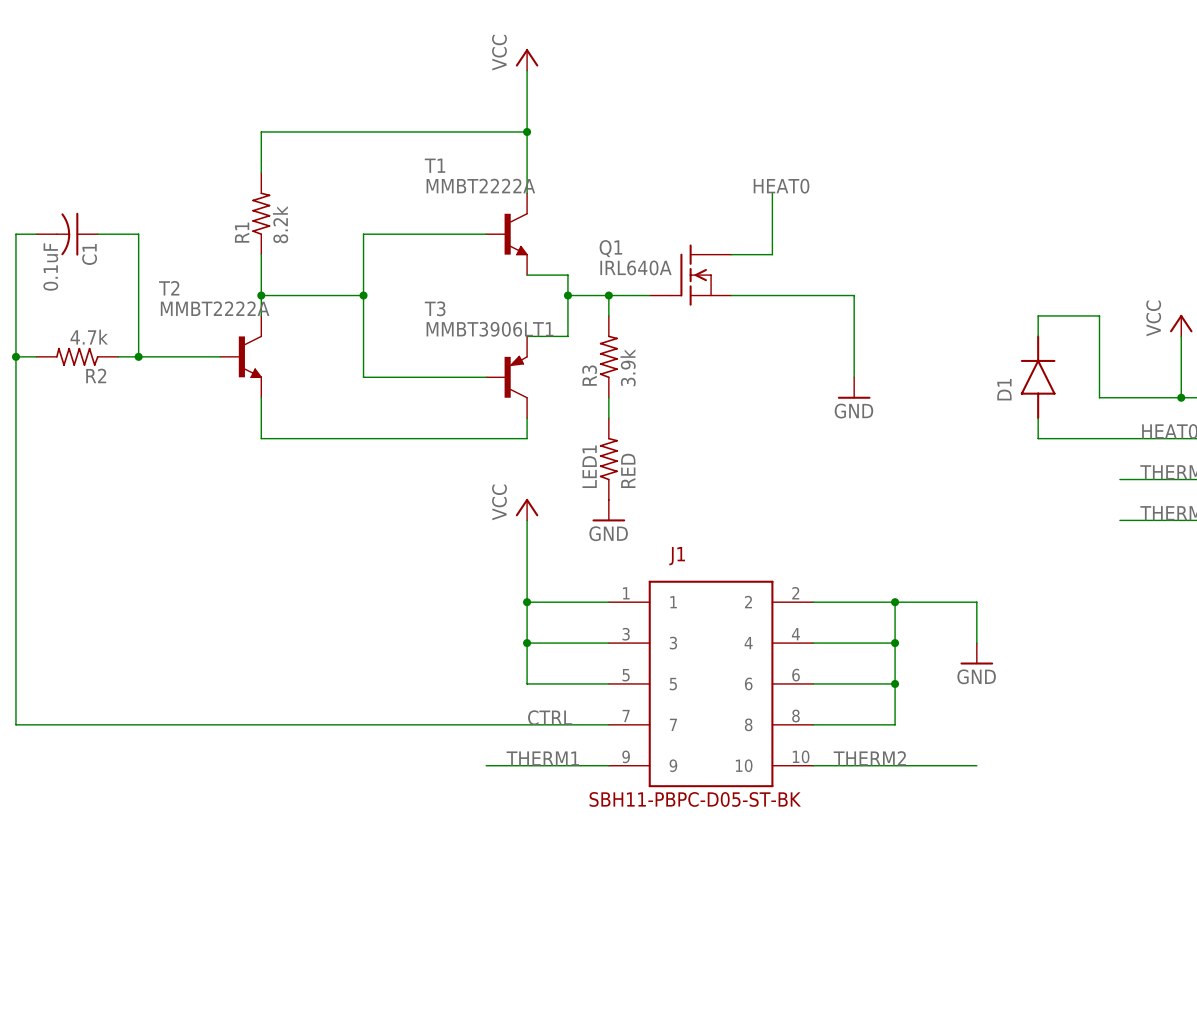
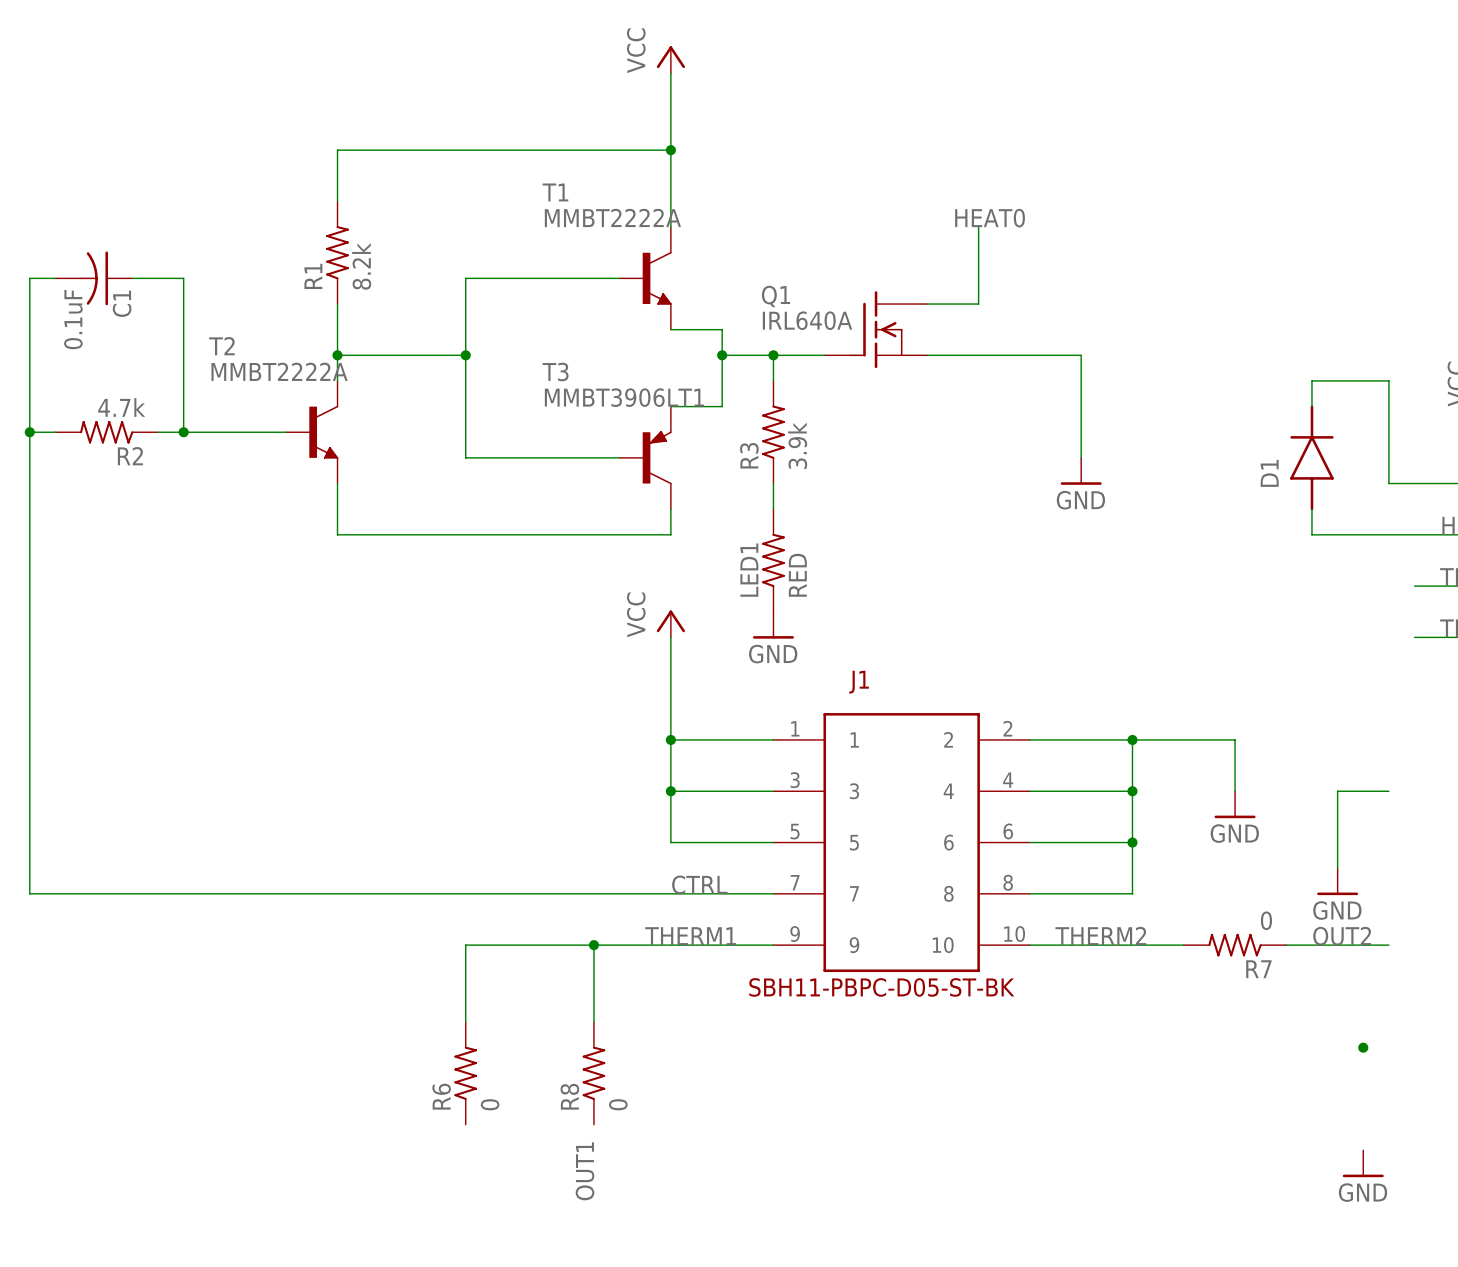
wire: none -> (1388, 791) (1337, 791) (1337, 868)
power symbol: none -> GND (1337, 881)
label: none -> OUT2 (1342, 936)
wire: none -> (593, 945) (593, 1022)
junction: none -> (593, 945)
wire: none -> (619, 945) (465, 945) (465, 1022)
R7: none -> 0 (1235, 945)
wire: none -> (1286, 945) (1388, 945)
junction: none -> (1363, 1047)
R6: none -> 0 (465, 1073)
R8: none -> 0 (593, 1073)
power symbol: none -> GND (1363, 1163)
label: none -> OUT1 (584, 1171)

